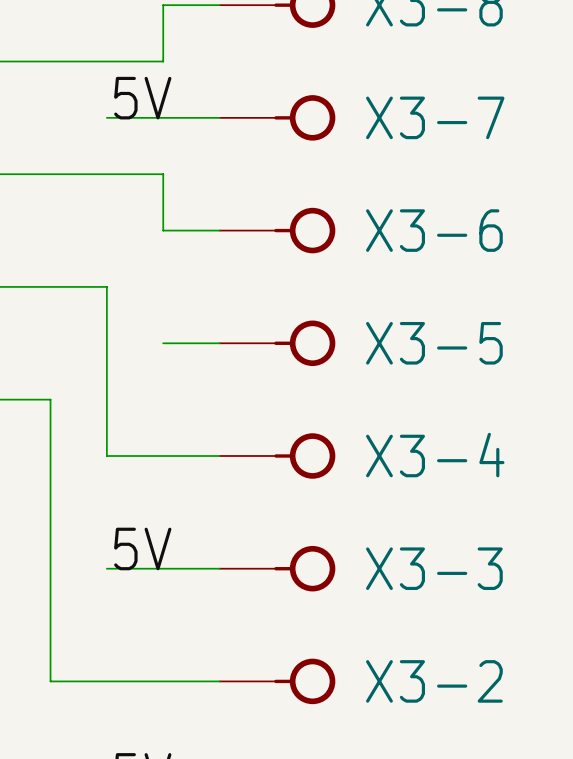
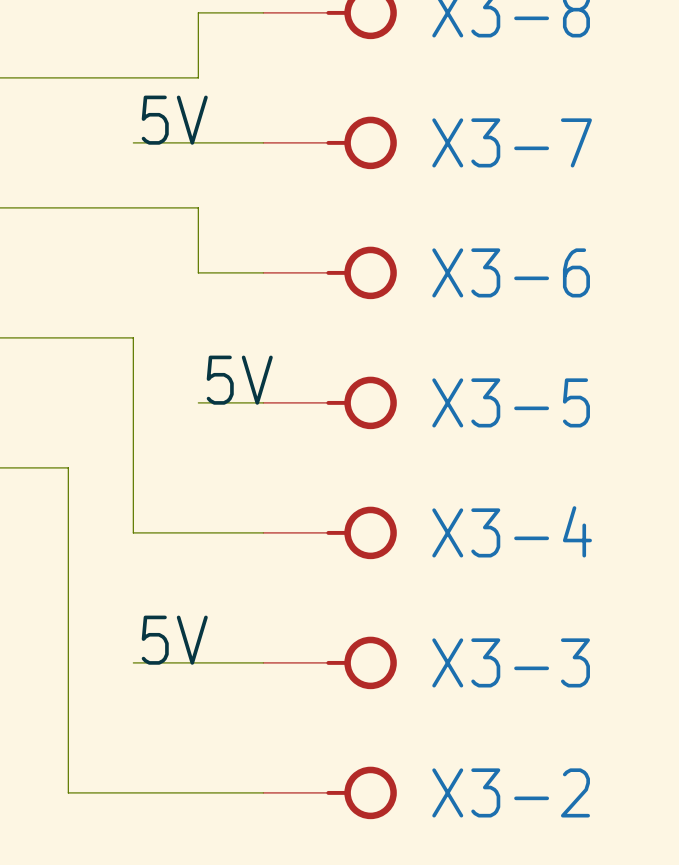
label: none -> 5V (239, 380)

